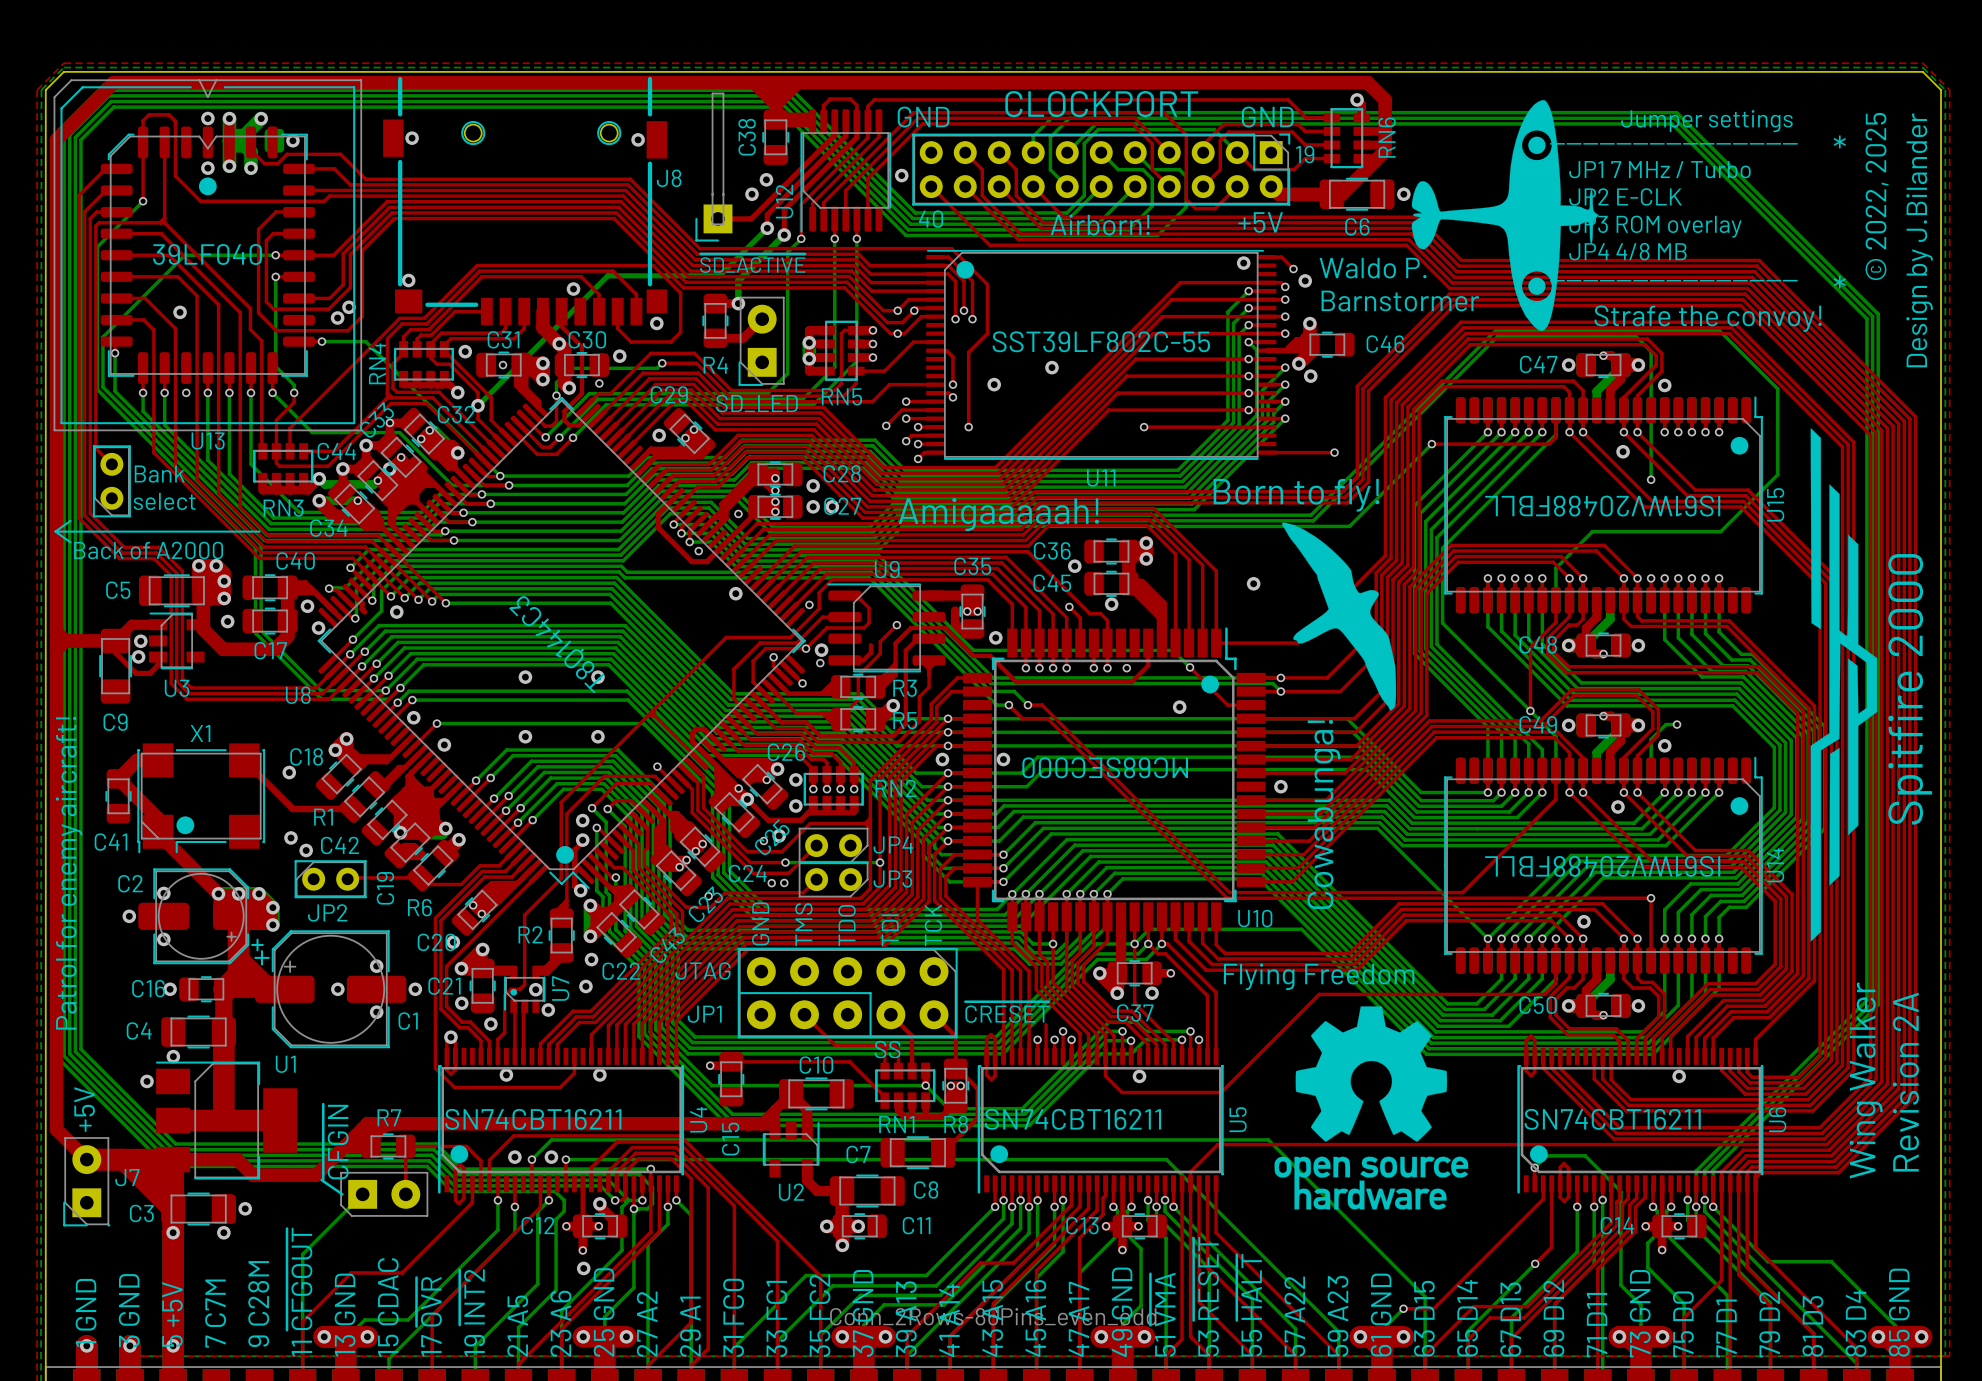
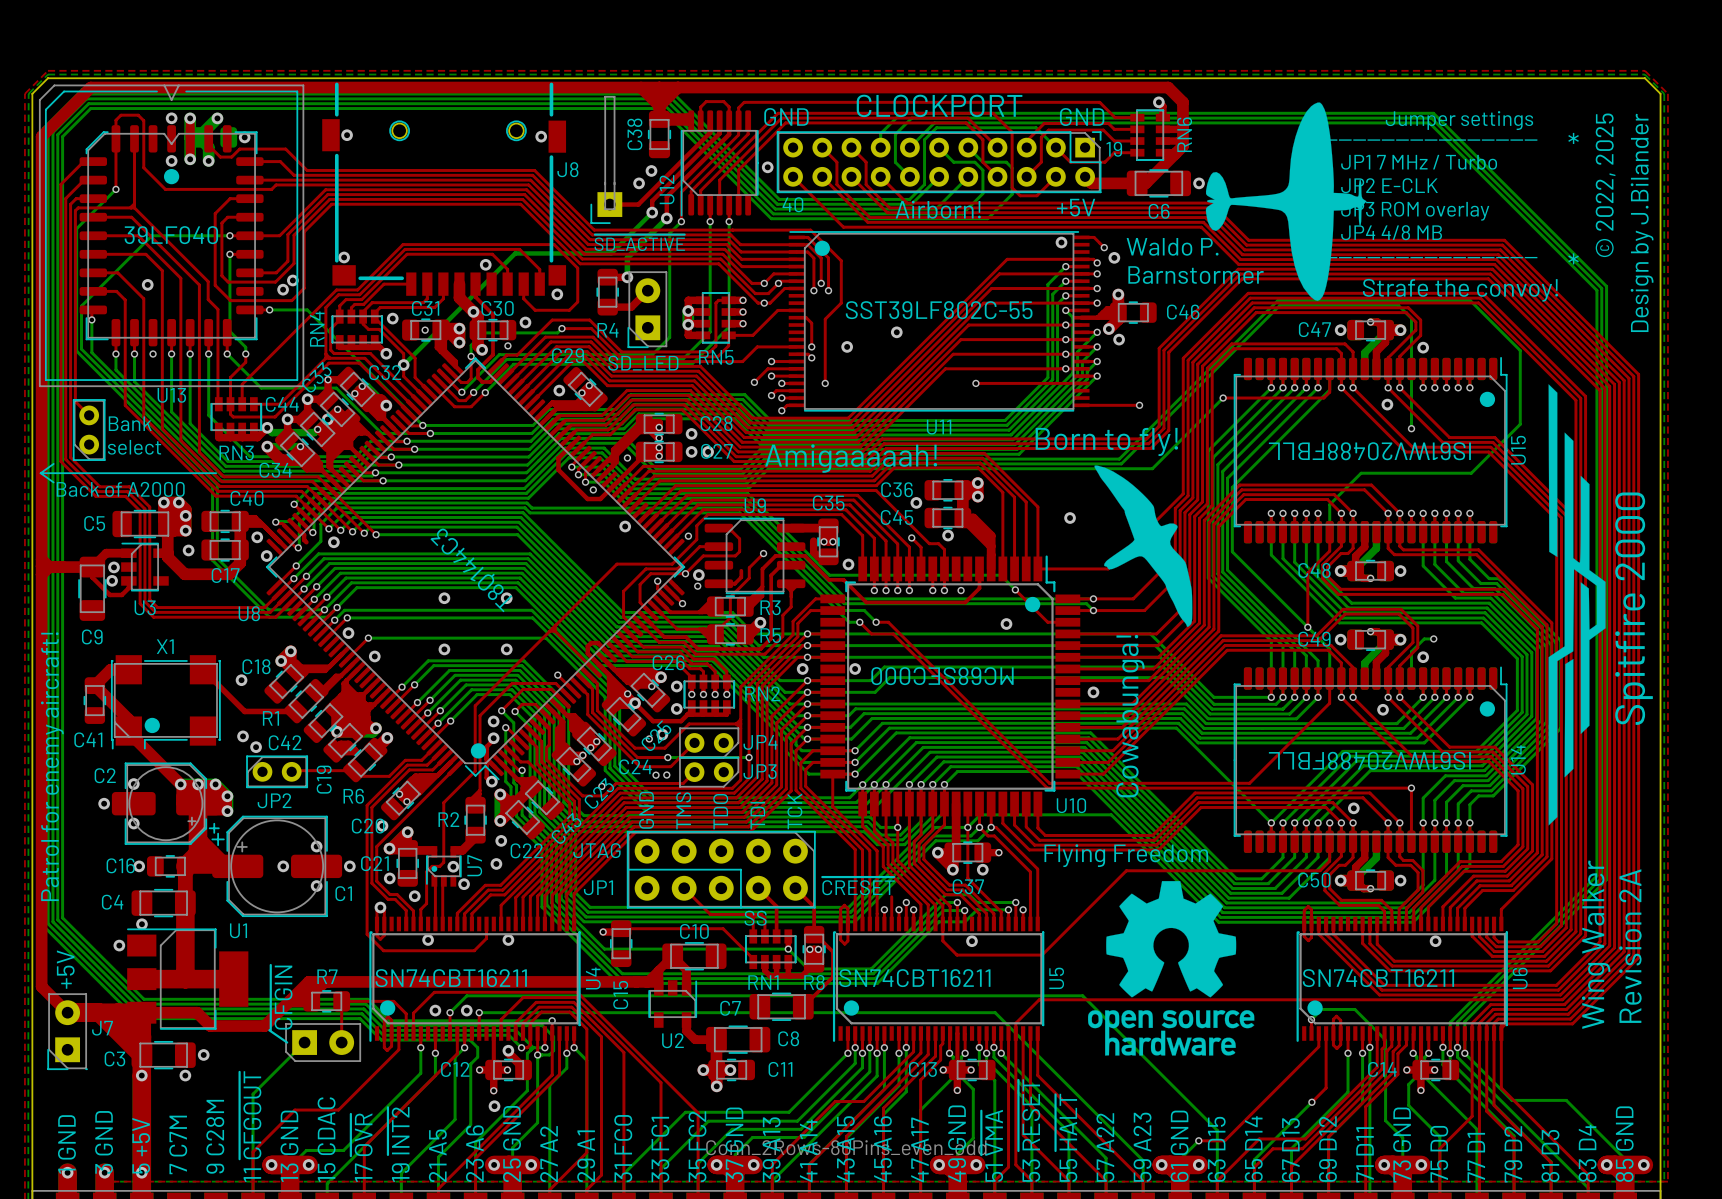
drawing shape: [1411, 100, 1599, 332] -> [1205, 102, 1367, 301]

